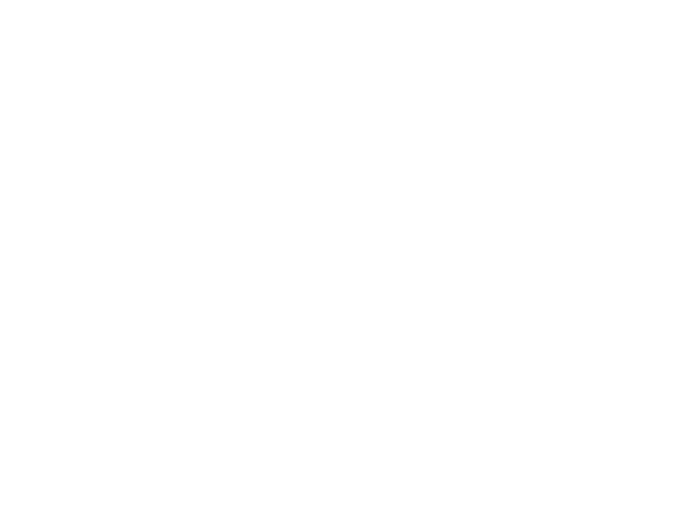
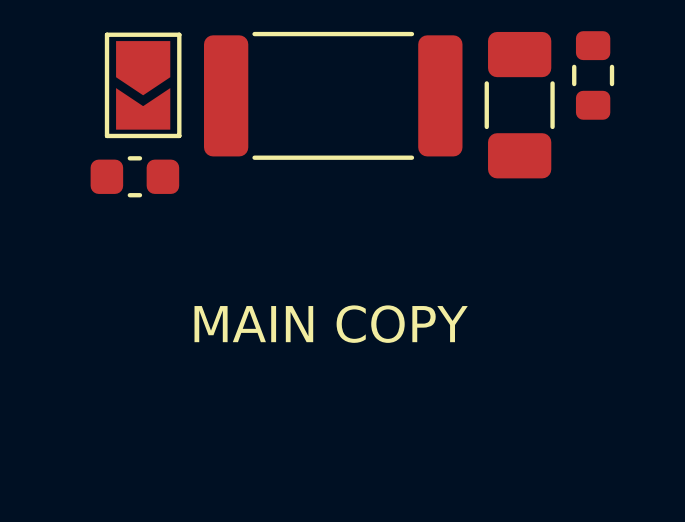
part: none -> (593, 75)
part: none -> (143, 85)
part: none -> (333, 95)
part: none -> (519, 105)
part: none -> (134, 176)
text: none -> MAIN COPY (331, 324)

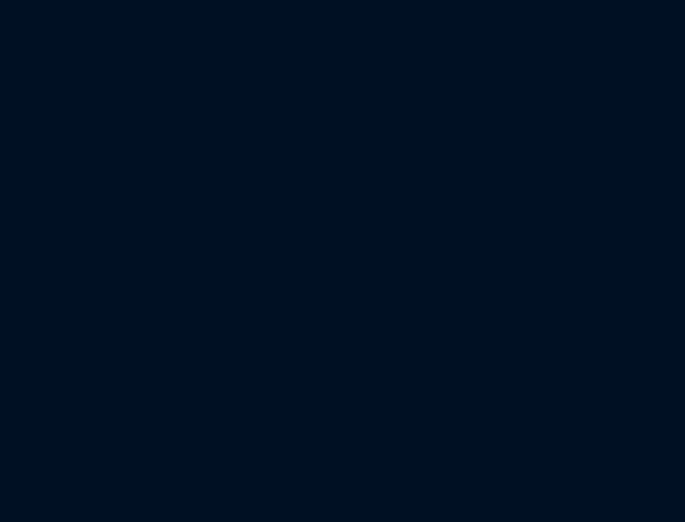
part: (593, 75) -> none
part: (143, 85) -> none
part: (333, 95) -> none
part: (519, 105) -> none
part: (134, 176) -> none
text: MAIN COPY (331, 324) -> none

